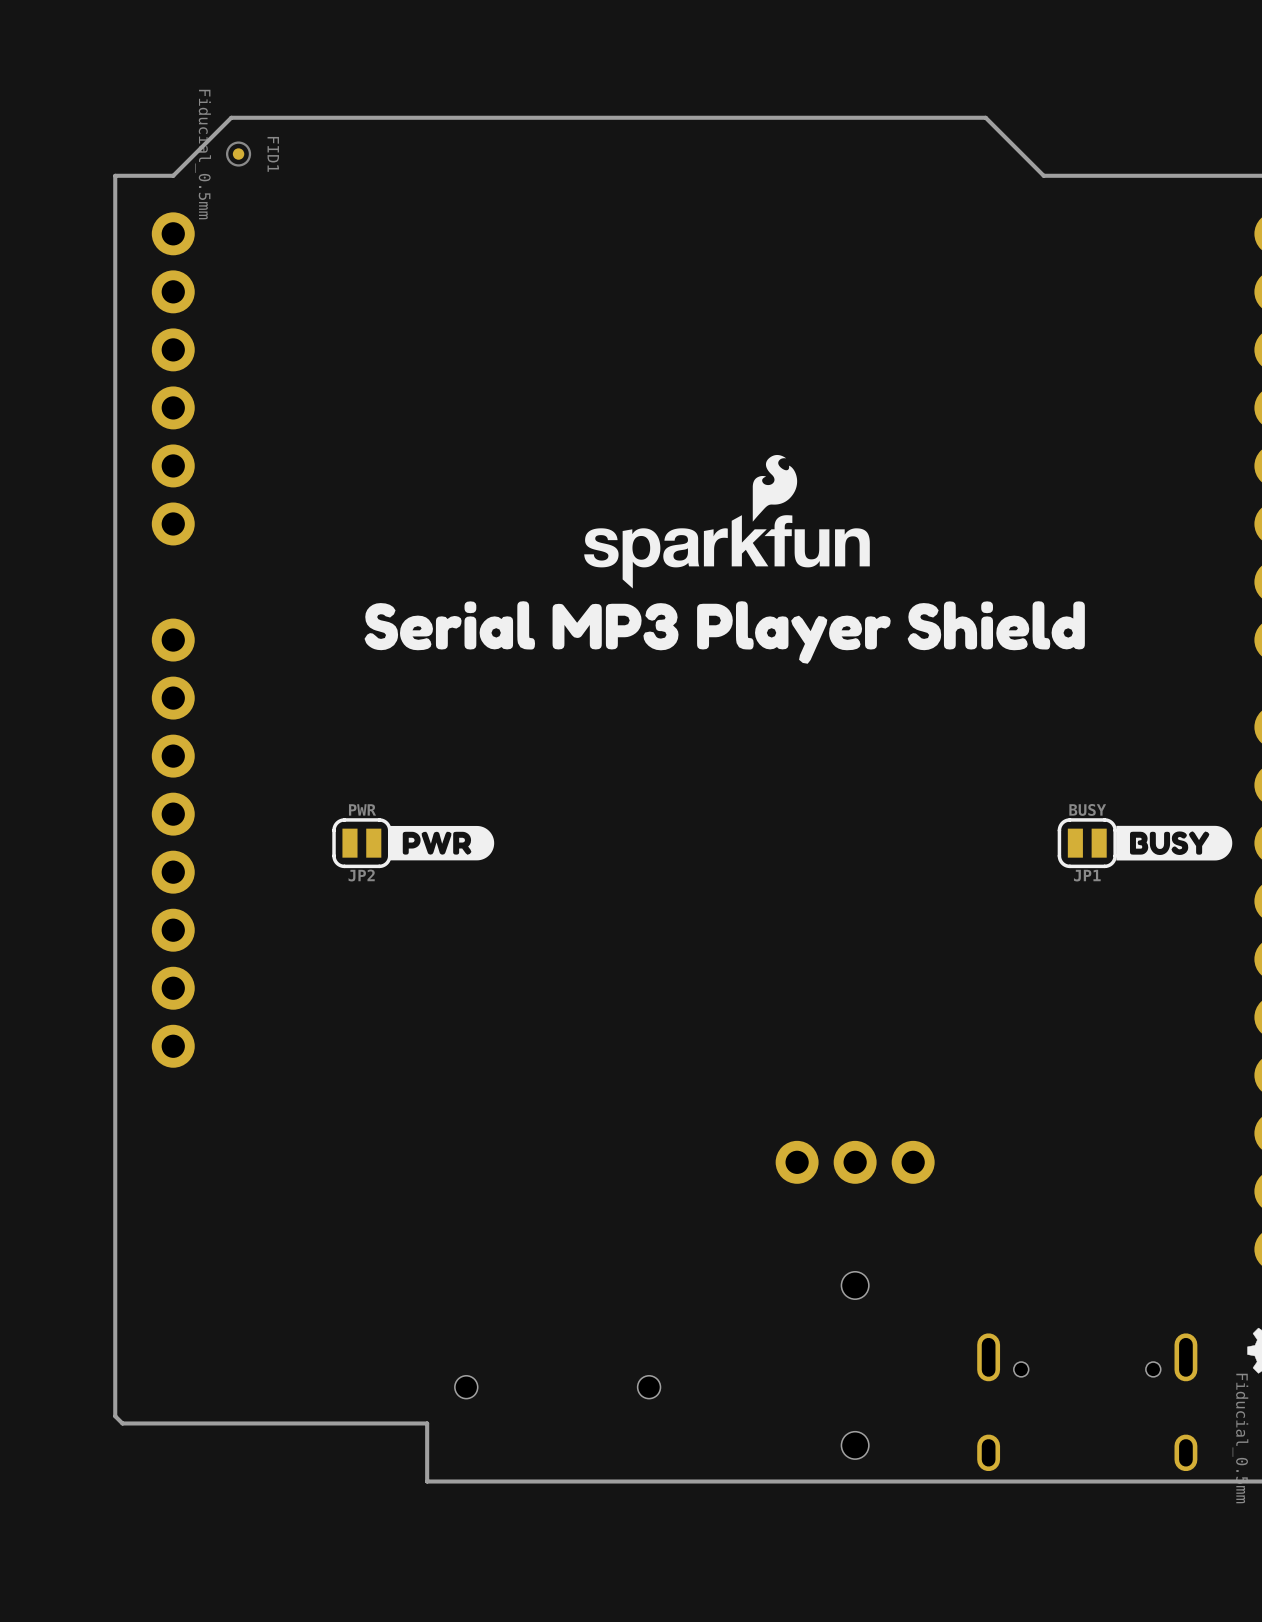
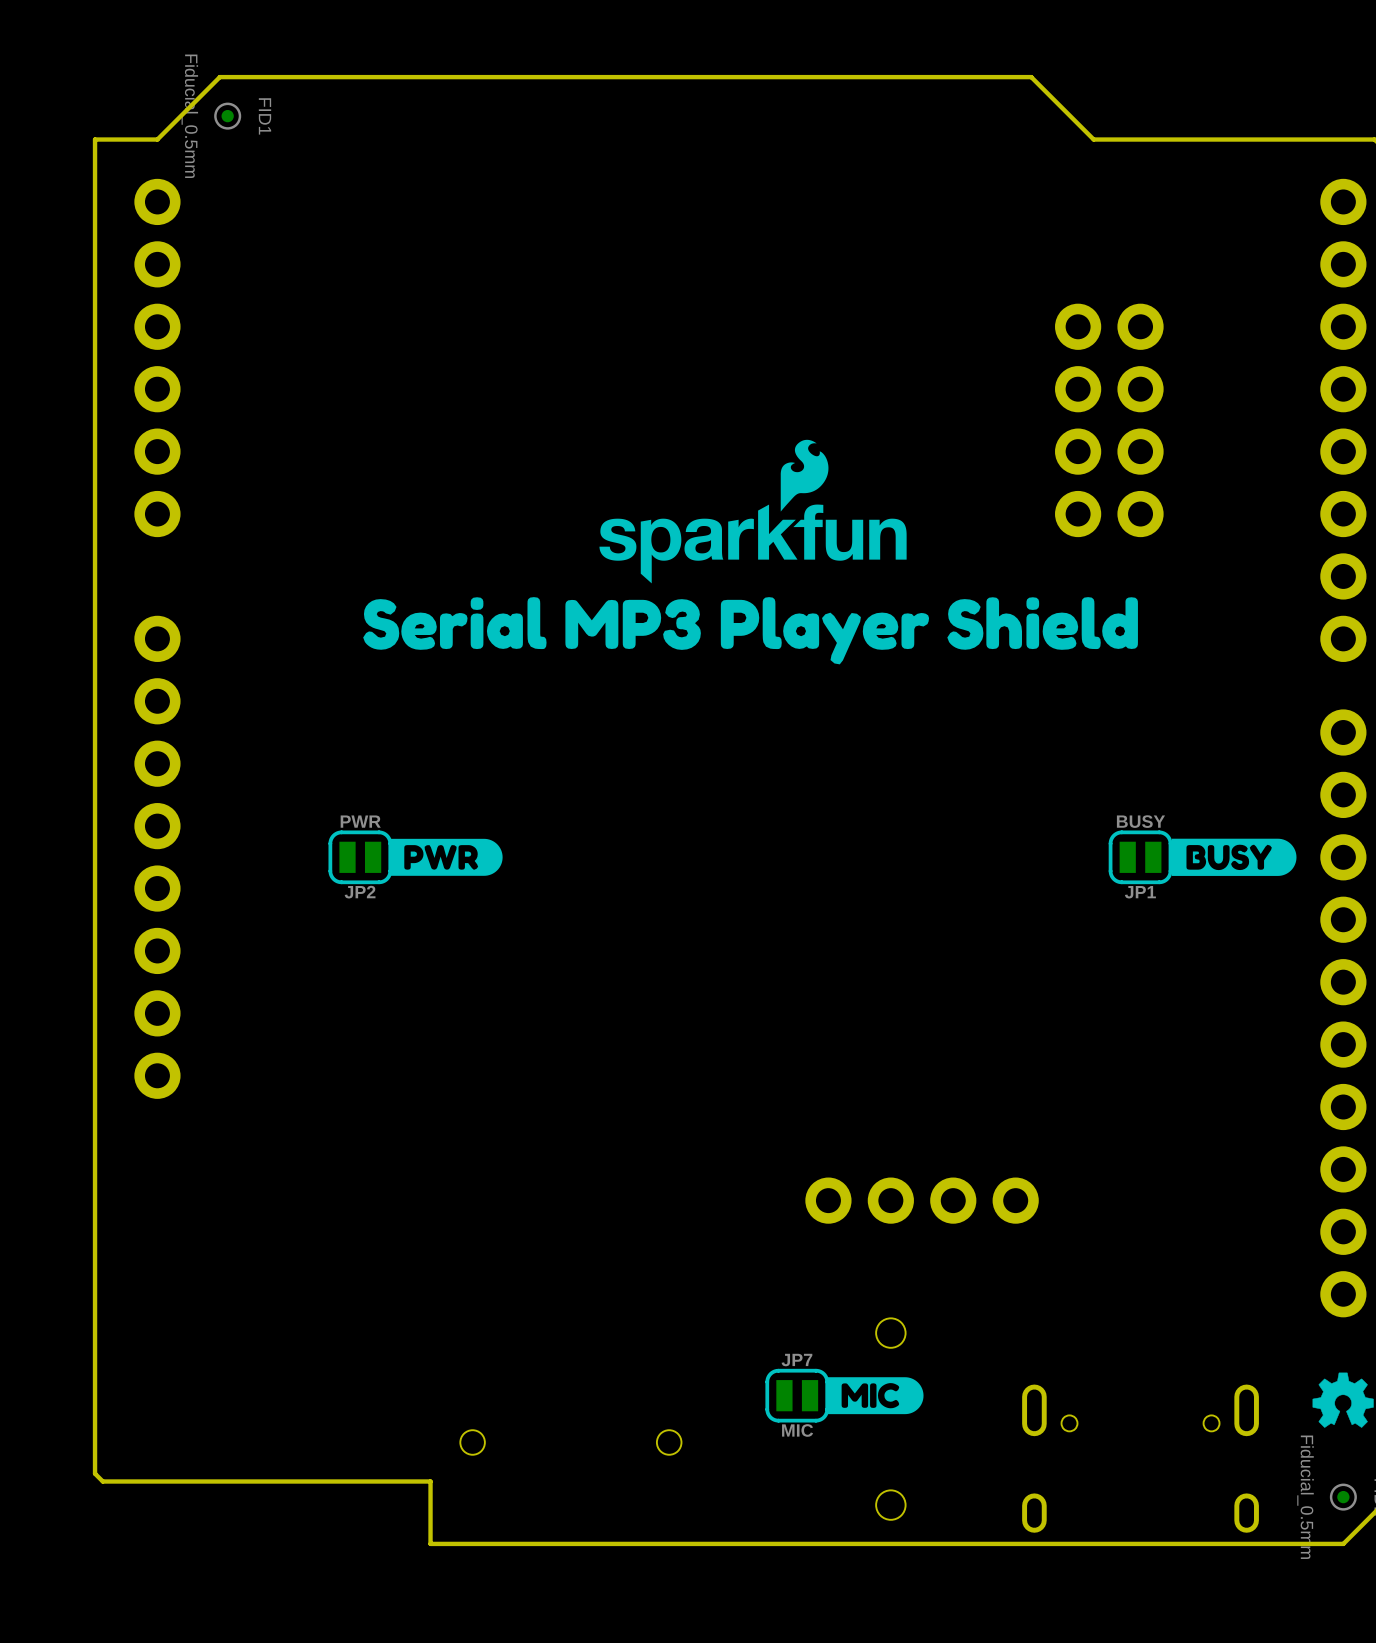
part: none -> (1109, 326)
part: none -> (1109, 389)
part: none -> (1109, 451)
part: none -> (1109, 514)
part: none -> (922, 1200)
drawing: none -> [826, 1377, 924, 1415]
JP7: none -> MIC (797, 1395)

